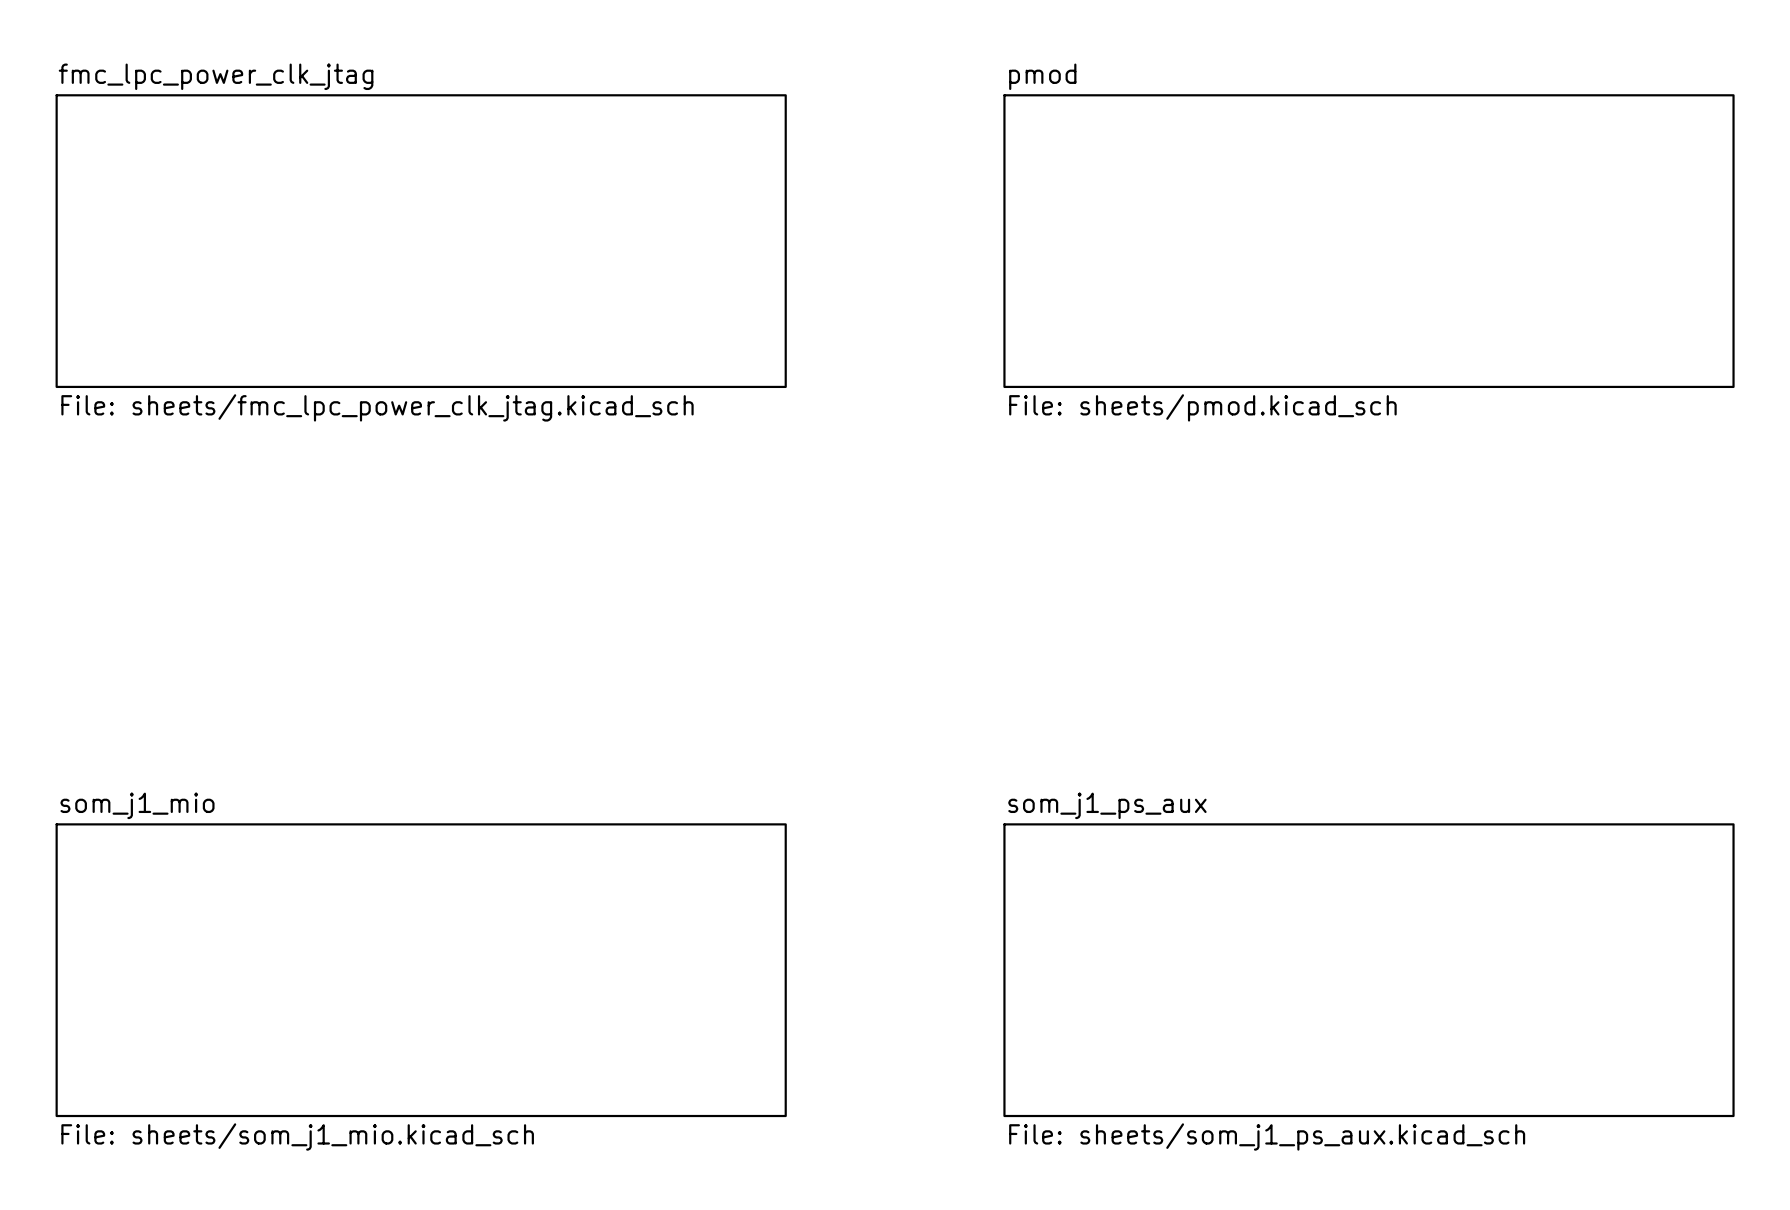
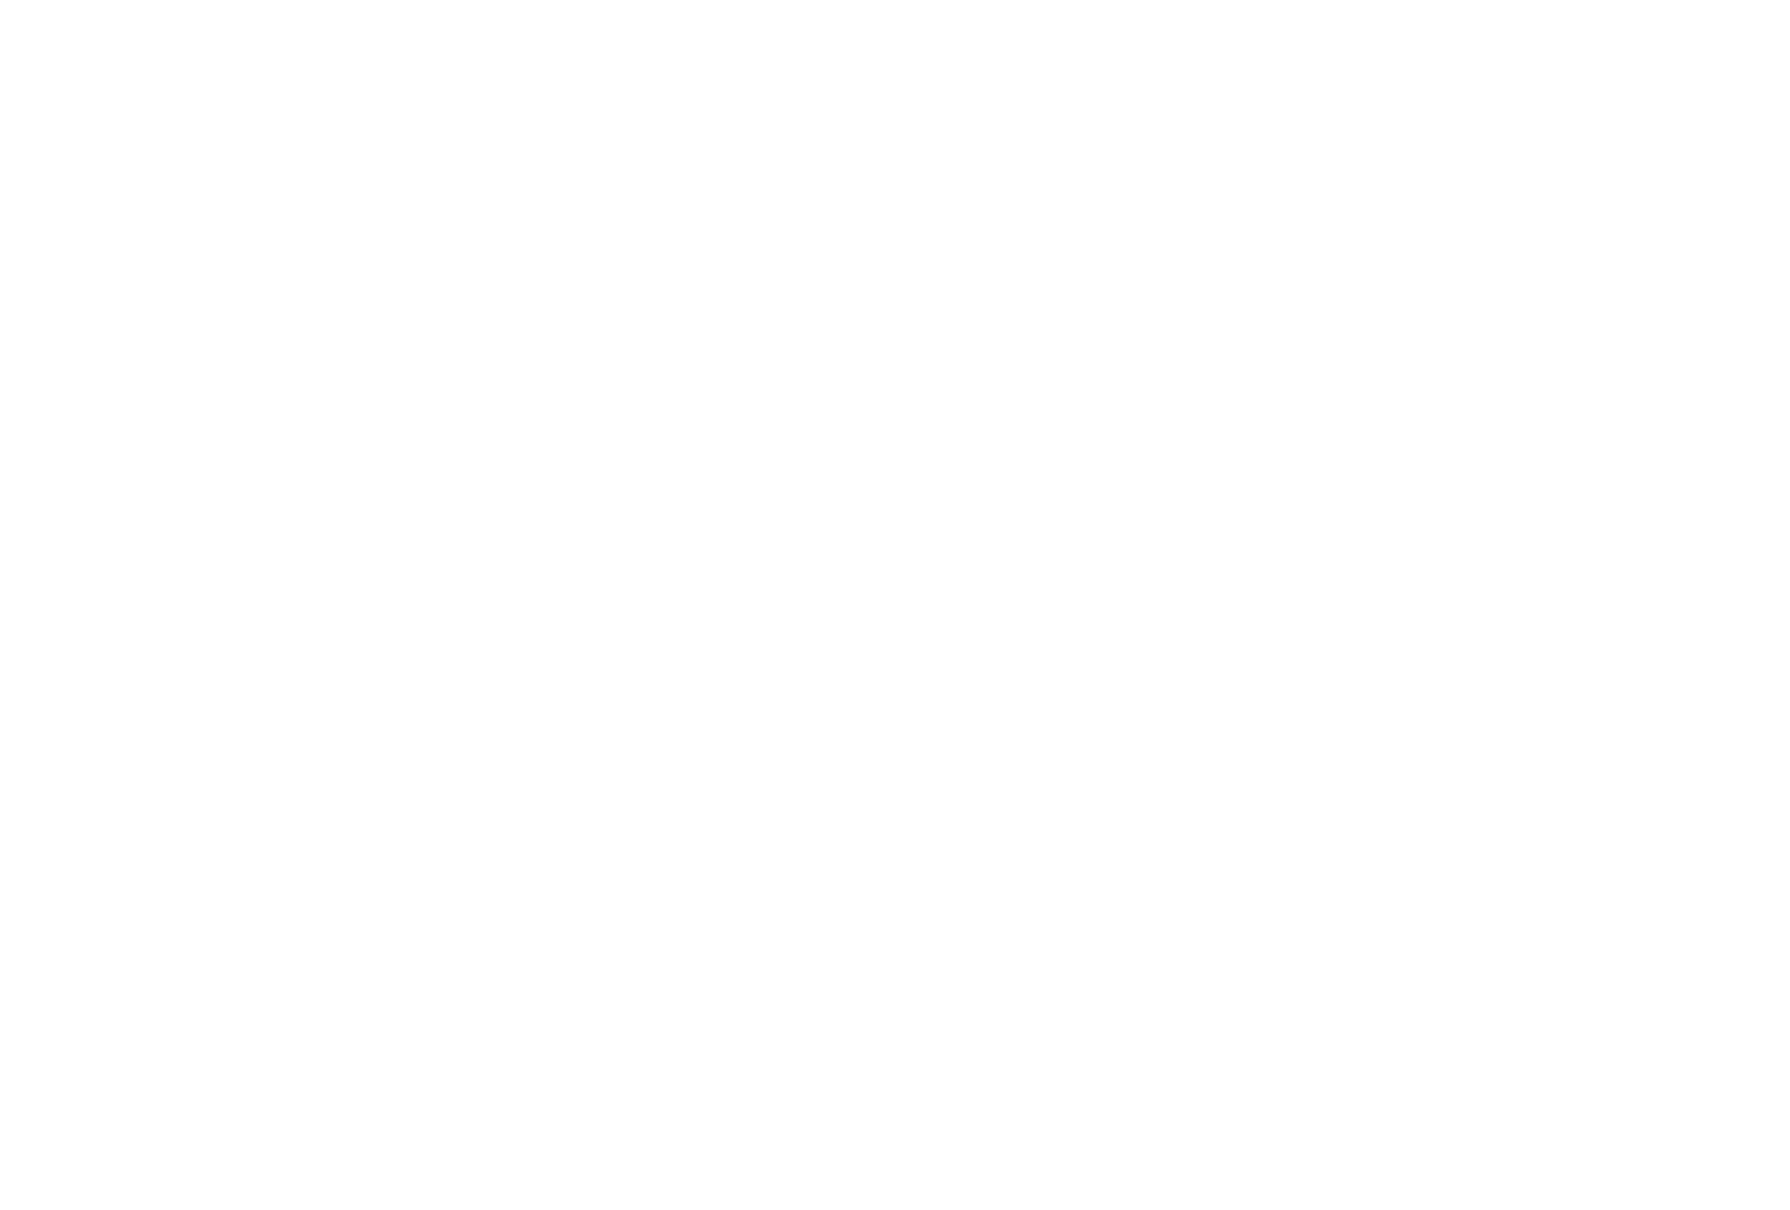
sheet fmc_lpc_power_clk_jtag: File: sheets/fmc_lpc_power_clk_jtag.kicad_sch (421, 241) -> none
sheet pmod: File: sheets/pmod.kicad_sch (1368, 241) -> none
sheet som_j1_mio: File: sheets/som_j1_mio.kicad_sch (421, 970) -> none
sheet som_j1_ps_aux: File: sheets/som_j1_ps_aux.kicad_sch (1368, 970) -> none

